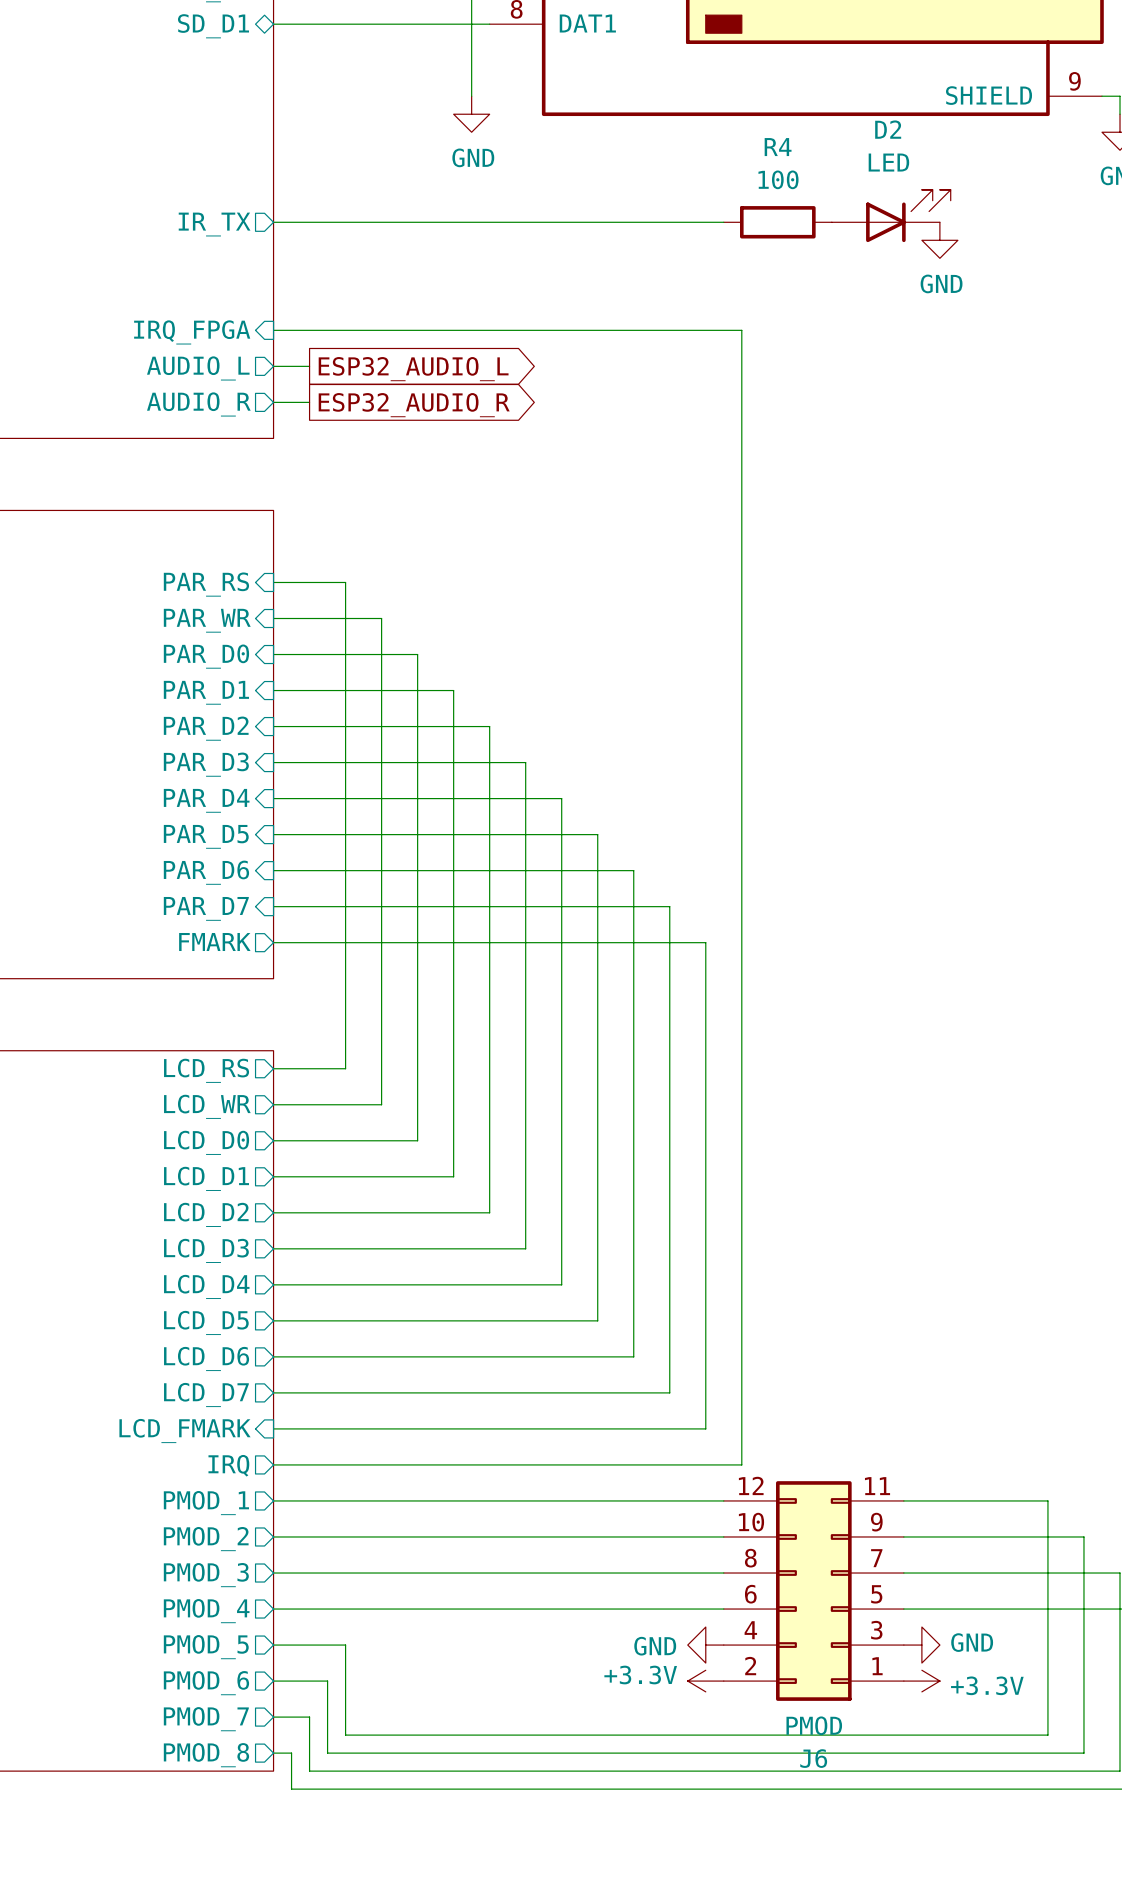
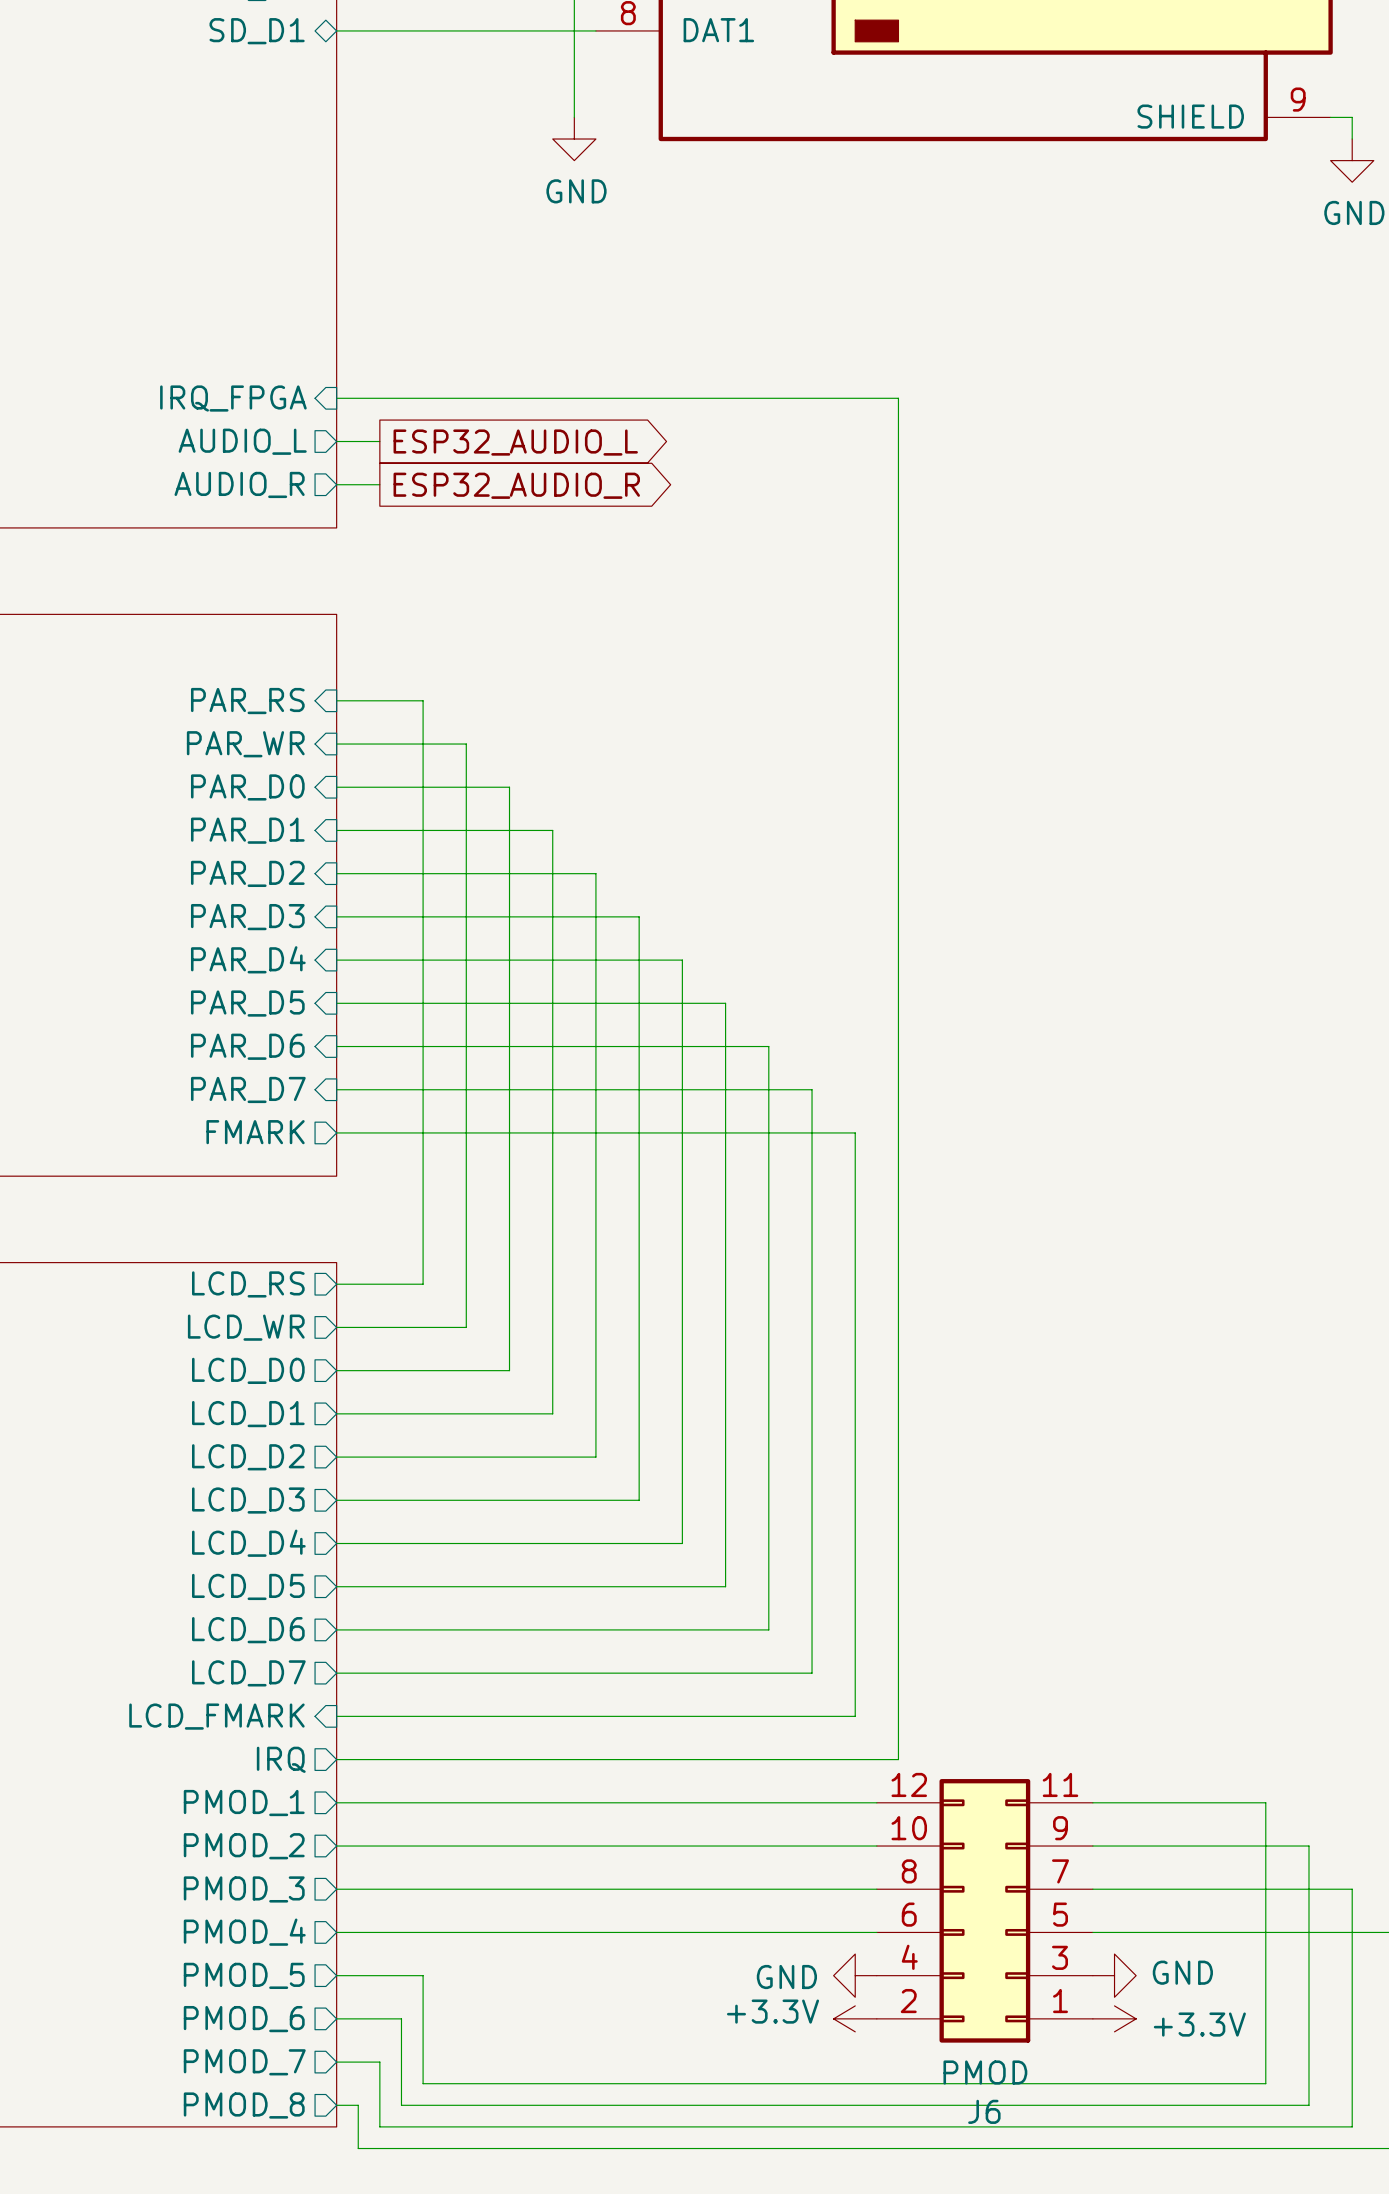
D2: LED (891, 215) -> none
wire: (273, 222) (723, 222) -> none
R4: 100 (777, 222) -> none
sheet pin: IR_TX (214, 224) -> none
power symbol: GND (939, 240) -> none

